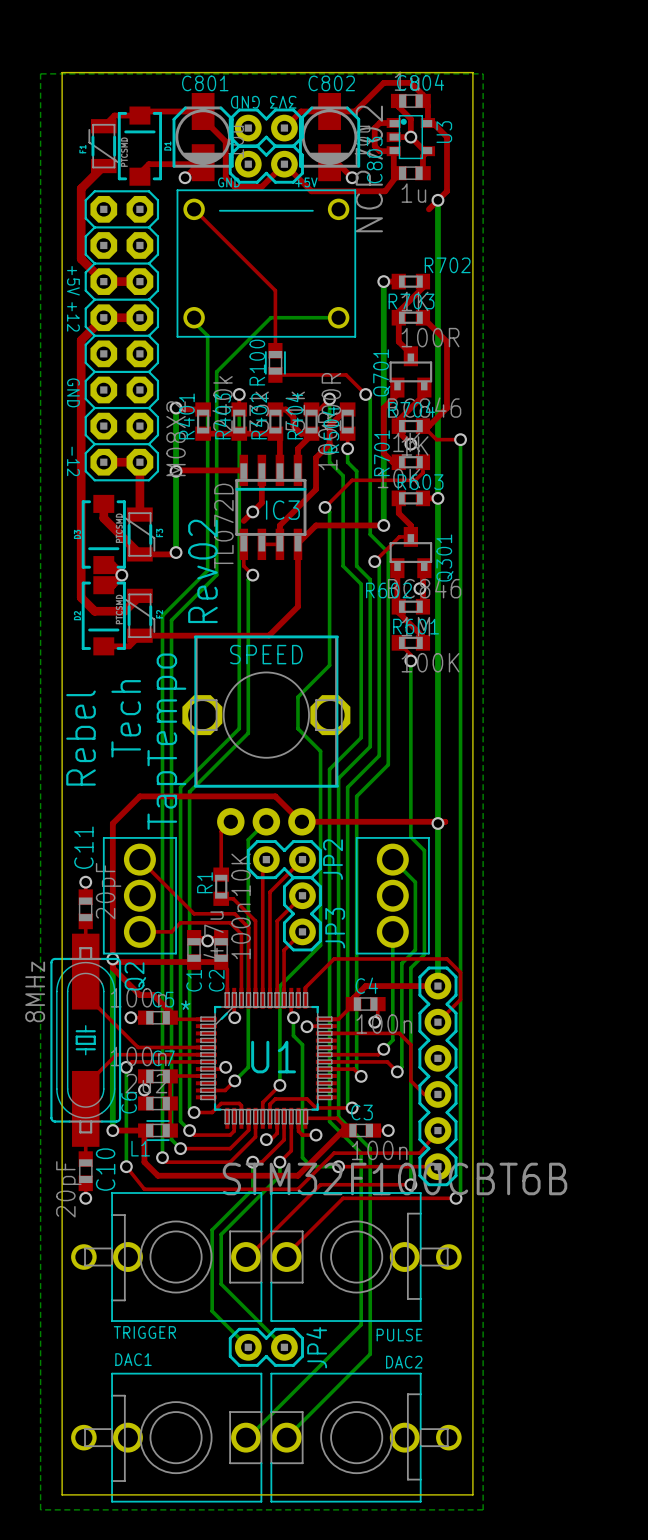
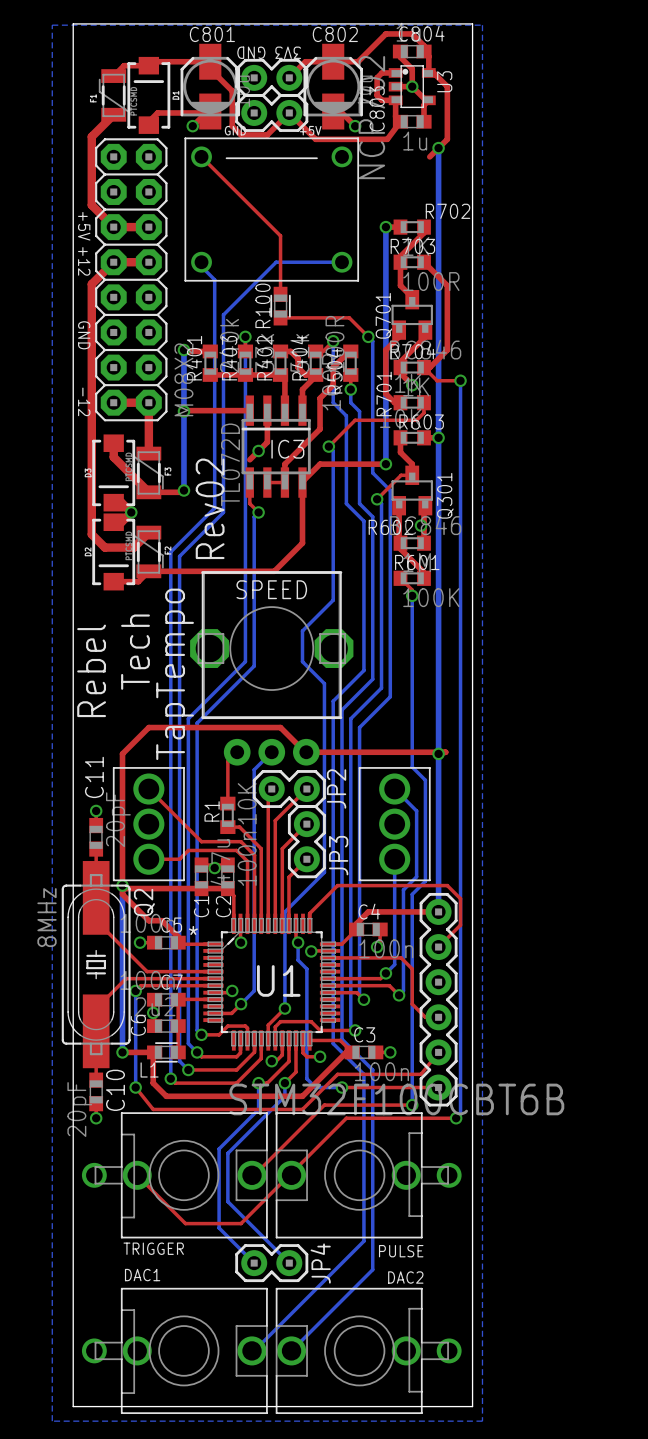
top track: none -> (137, 1175) (185, 1223) (241, 1223) (289, 1175) (291, 1175)

